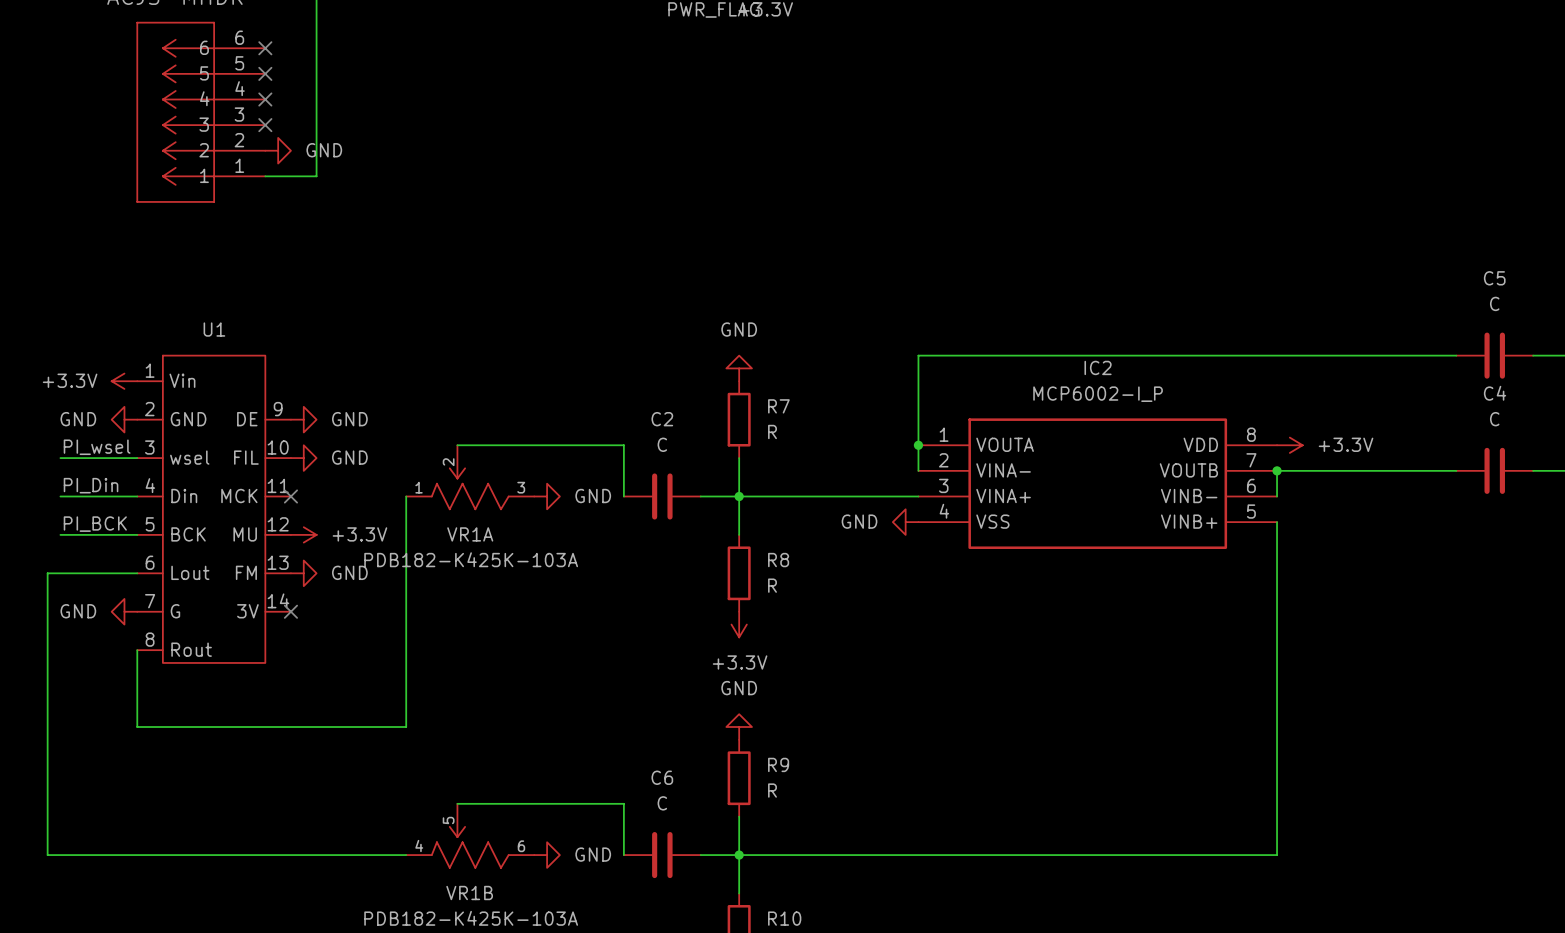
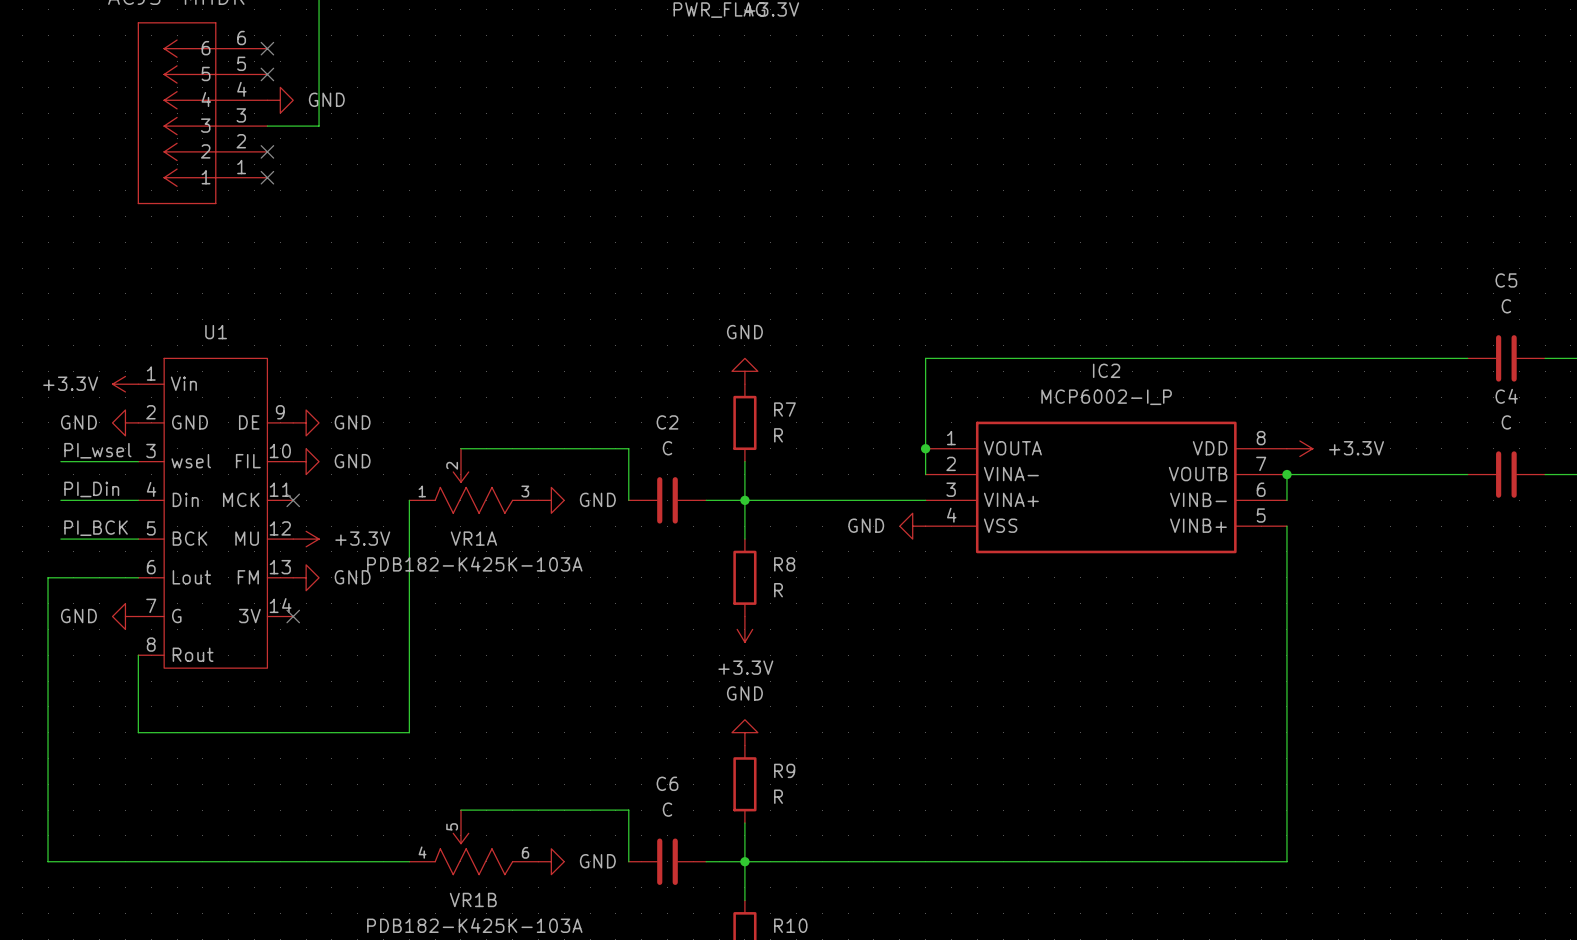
no-connect mark: (265, 99) -> none
no-connect mark: (265, 125) -> none
wire: (316, 125) (316, 176) (265, 176) -> (319, 126) (267, 126)
no-connect mark: none -> (267, 151)
power symbol position: GND (278, 150) -> GND (280, 100)
no-connect mark: none -> (267, 177)

